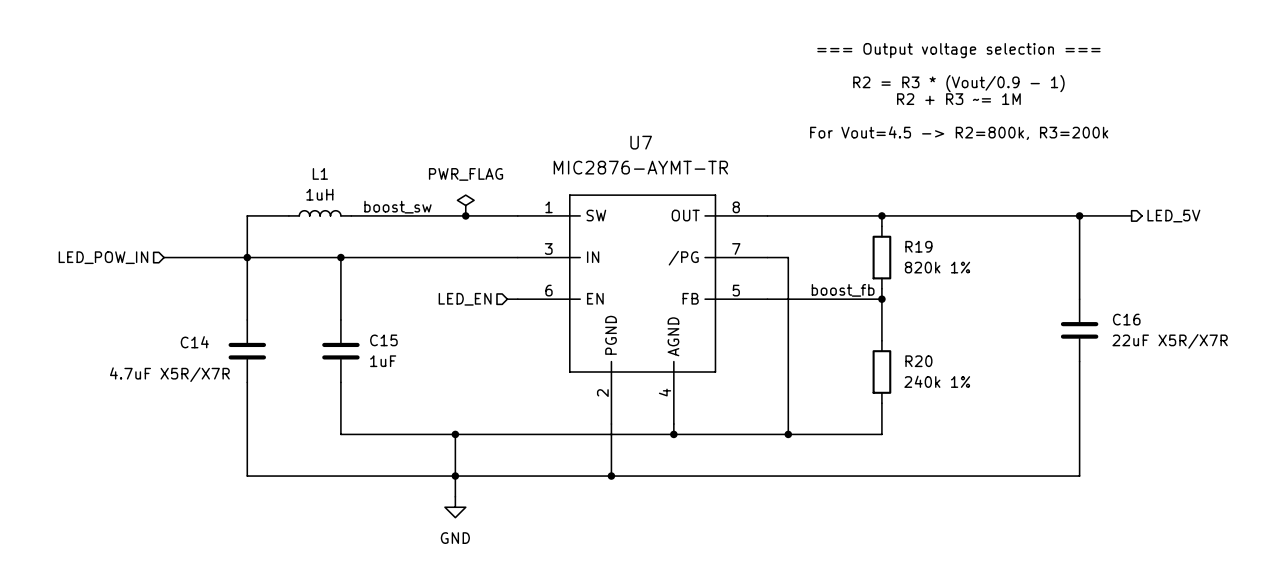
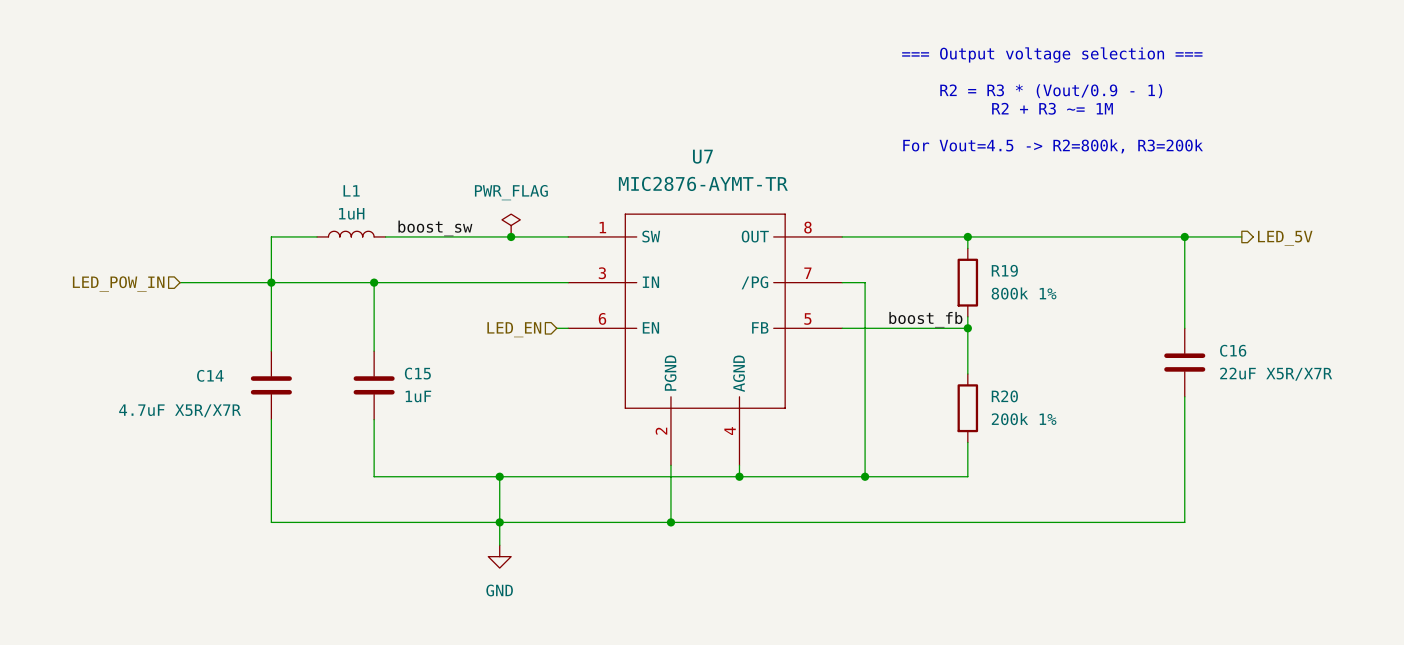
R19 value: 820k 1% (937, 267) -> 800k 1% (1024, 293)
R20 value: 240k 1% (937, 381) -> 200k 1% (1024, 419)

